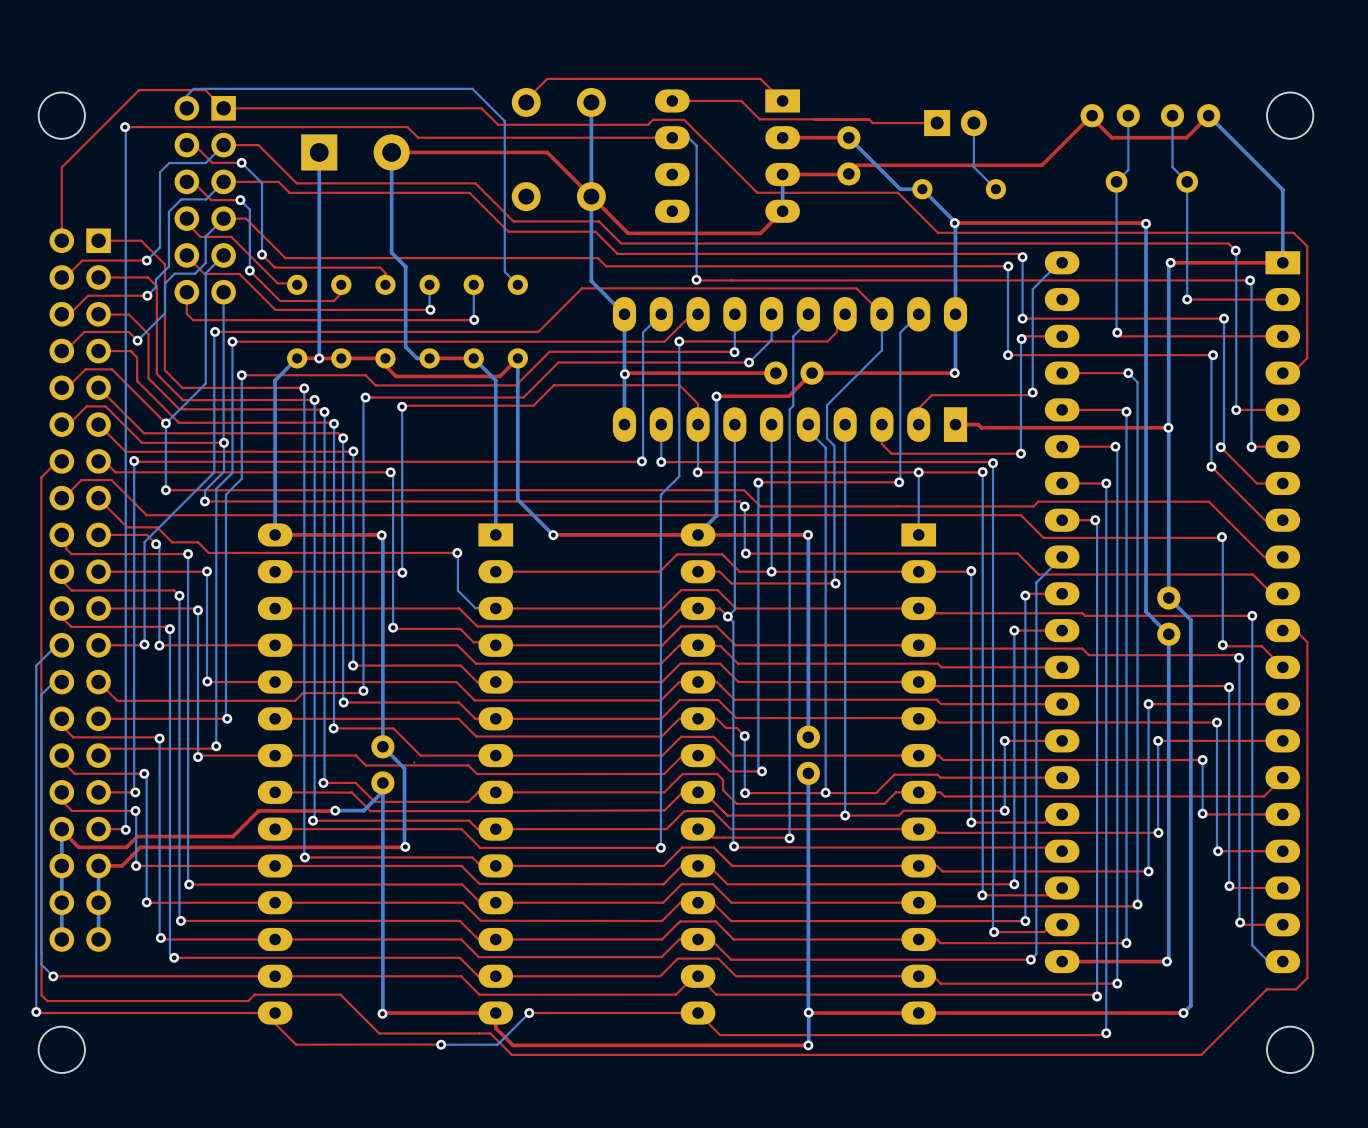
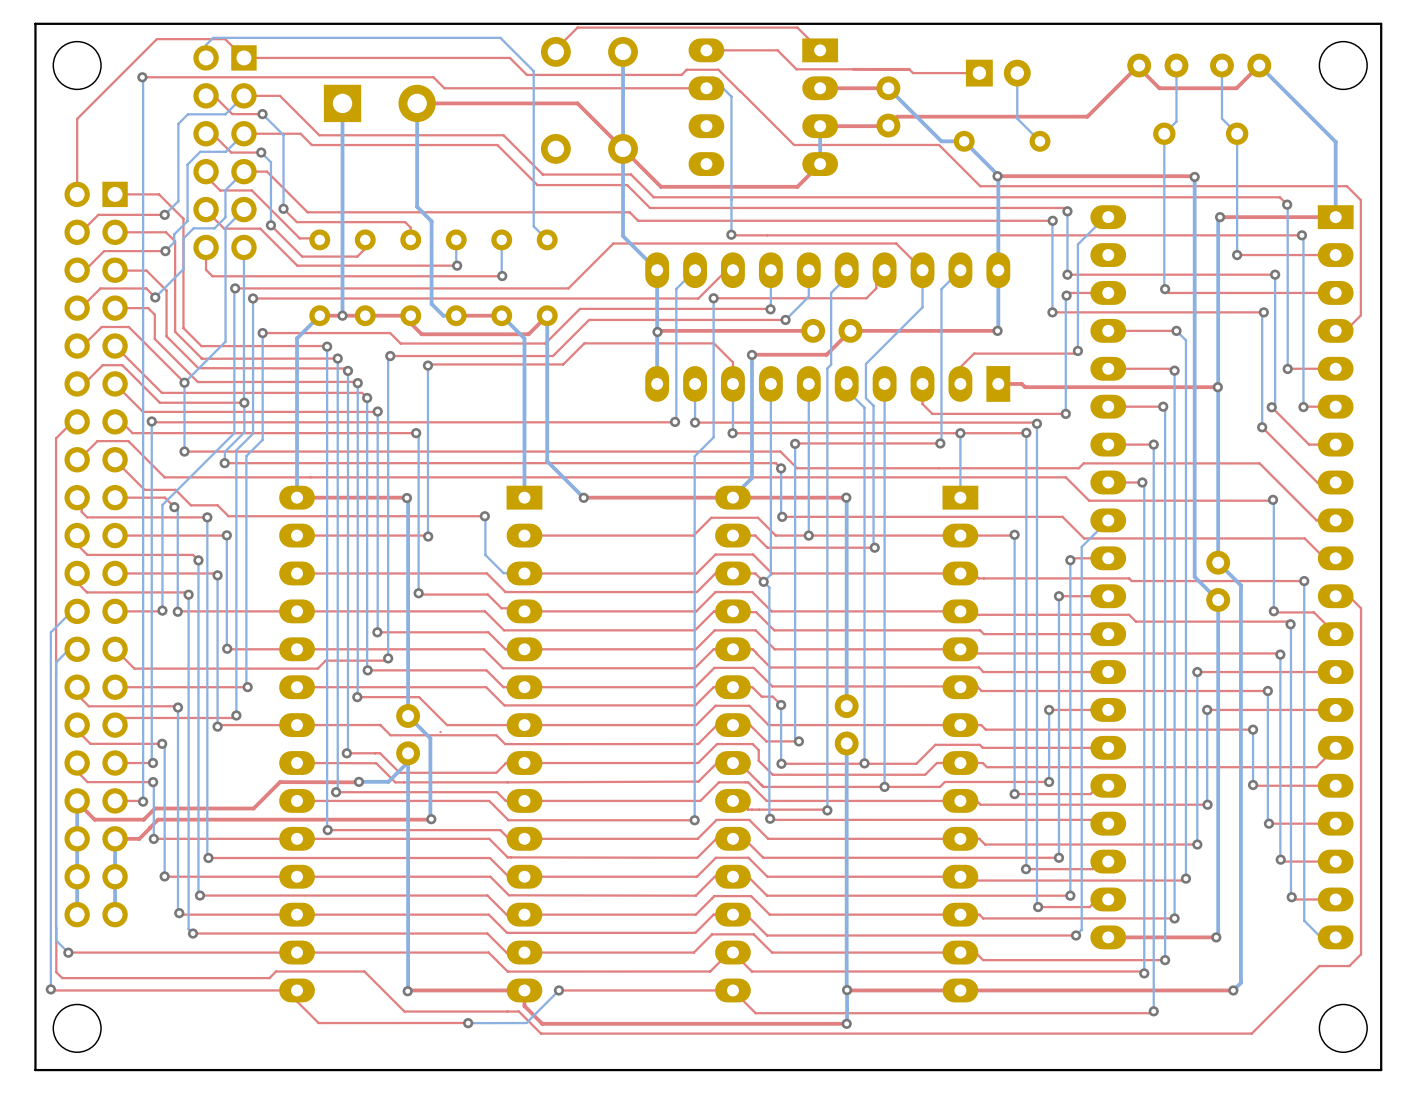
board edge: none -> (1381, 23) (1381, 1070) (35, 1070) (35, 23) (1381, 23)

